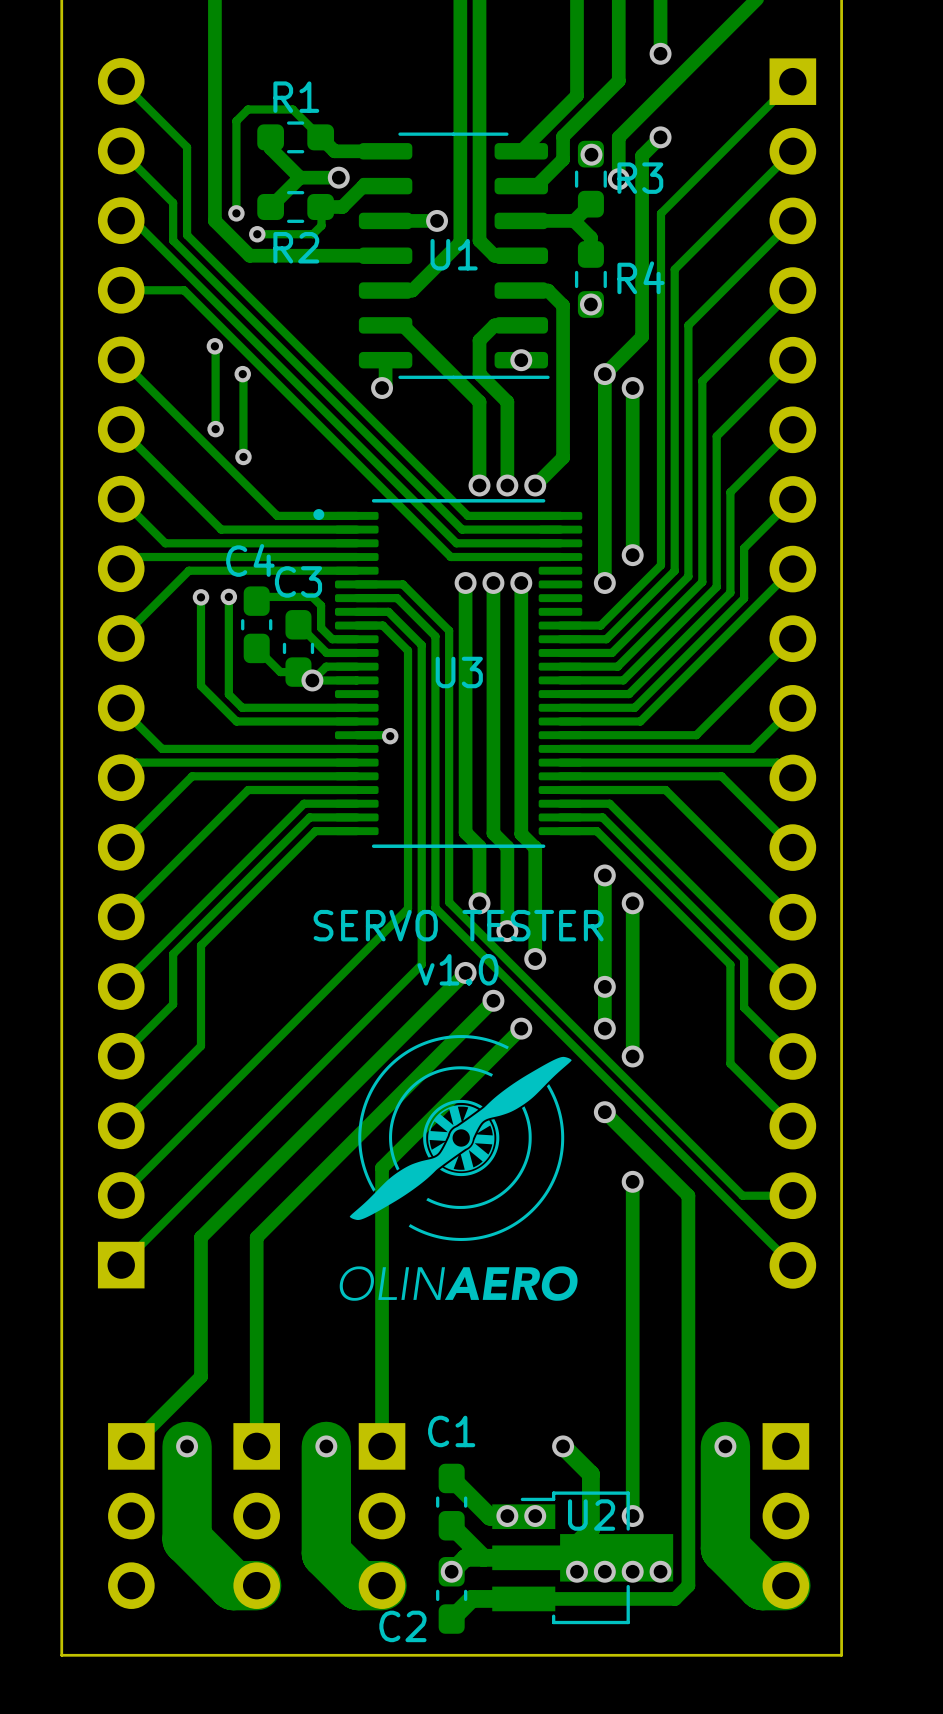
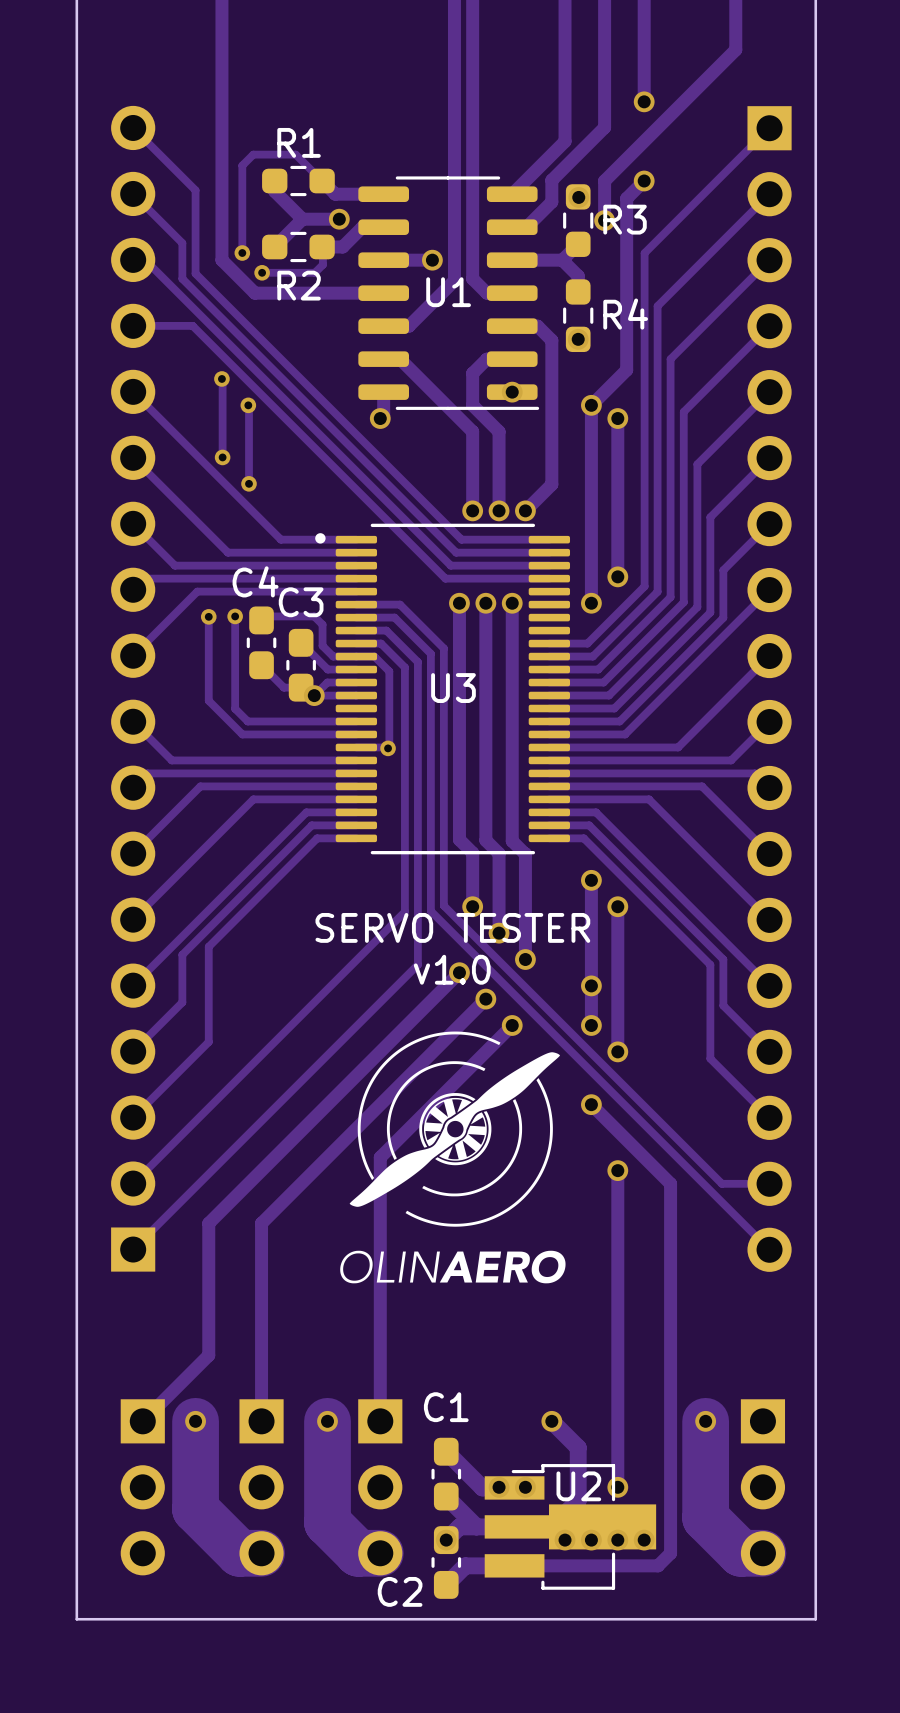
track: none -> (356, 656) (374, 656) (389, 671) (388, 748)

